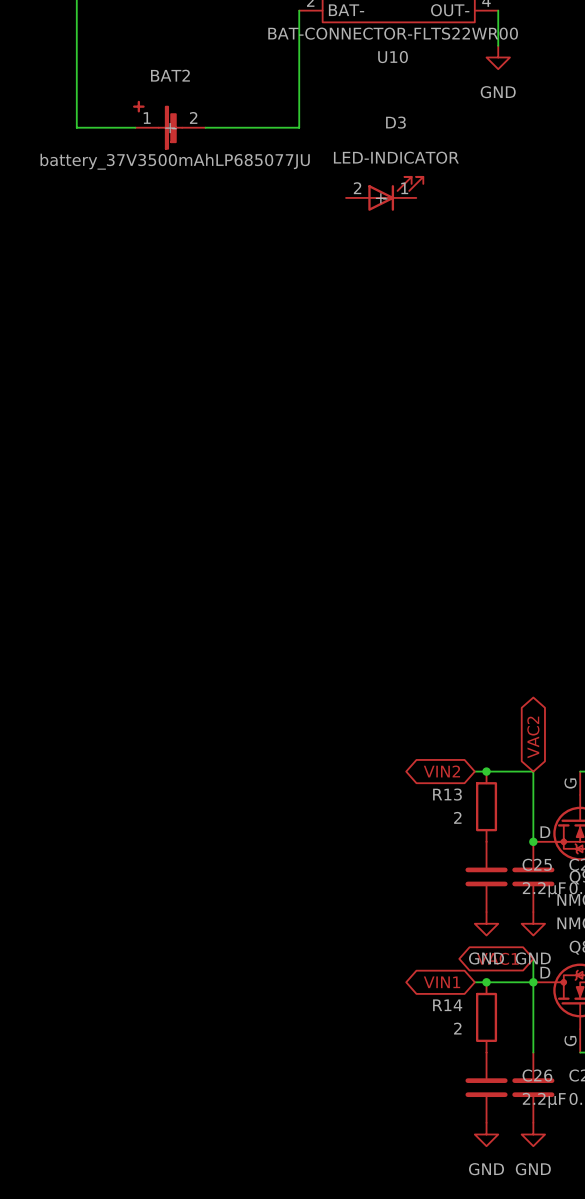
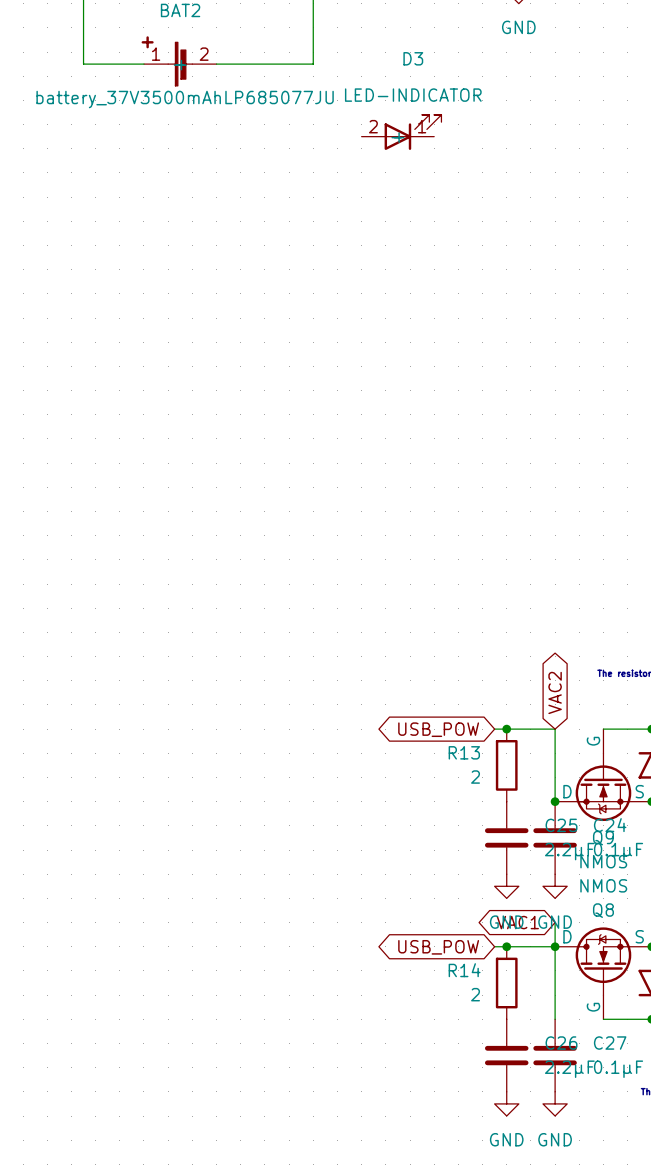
global label: VIN2 (441, 771) -> USB_POW (438, 729)
global label: VIN1 (442, 982) -> USB_POW (438, 947)

